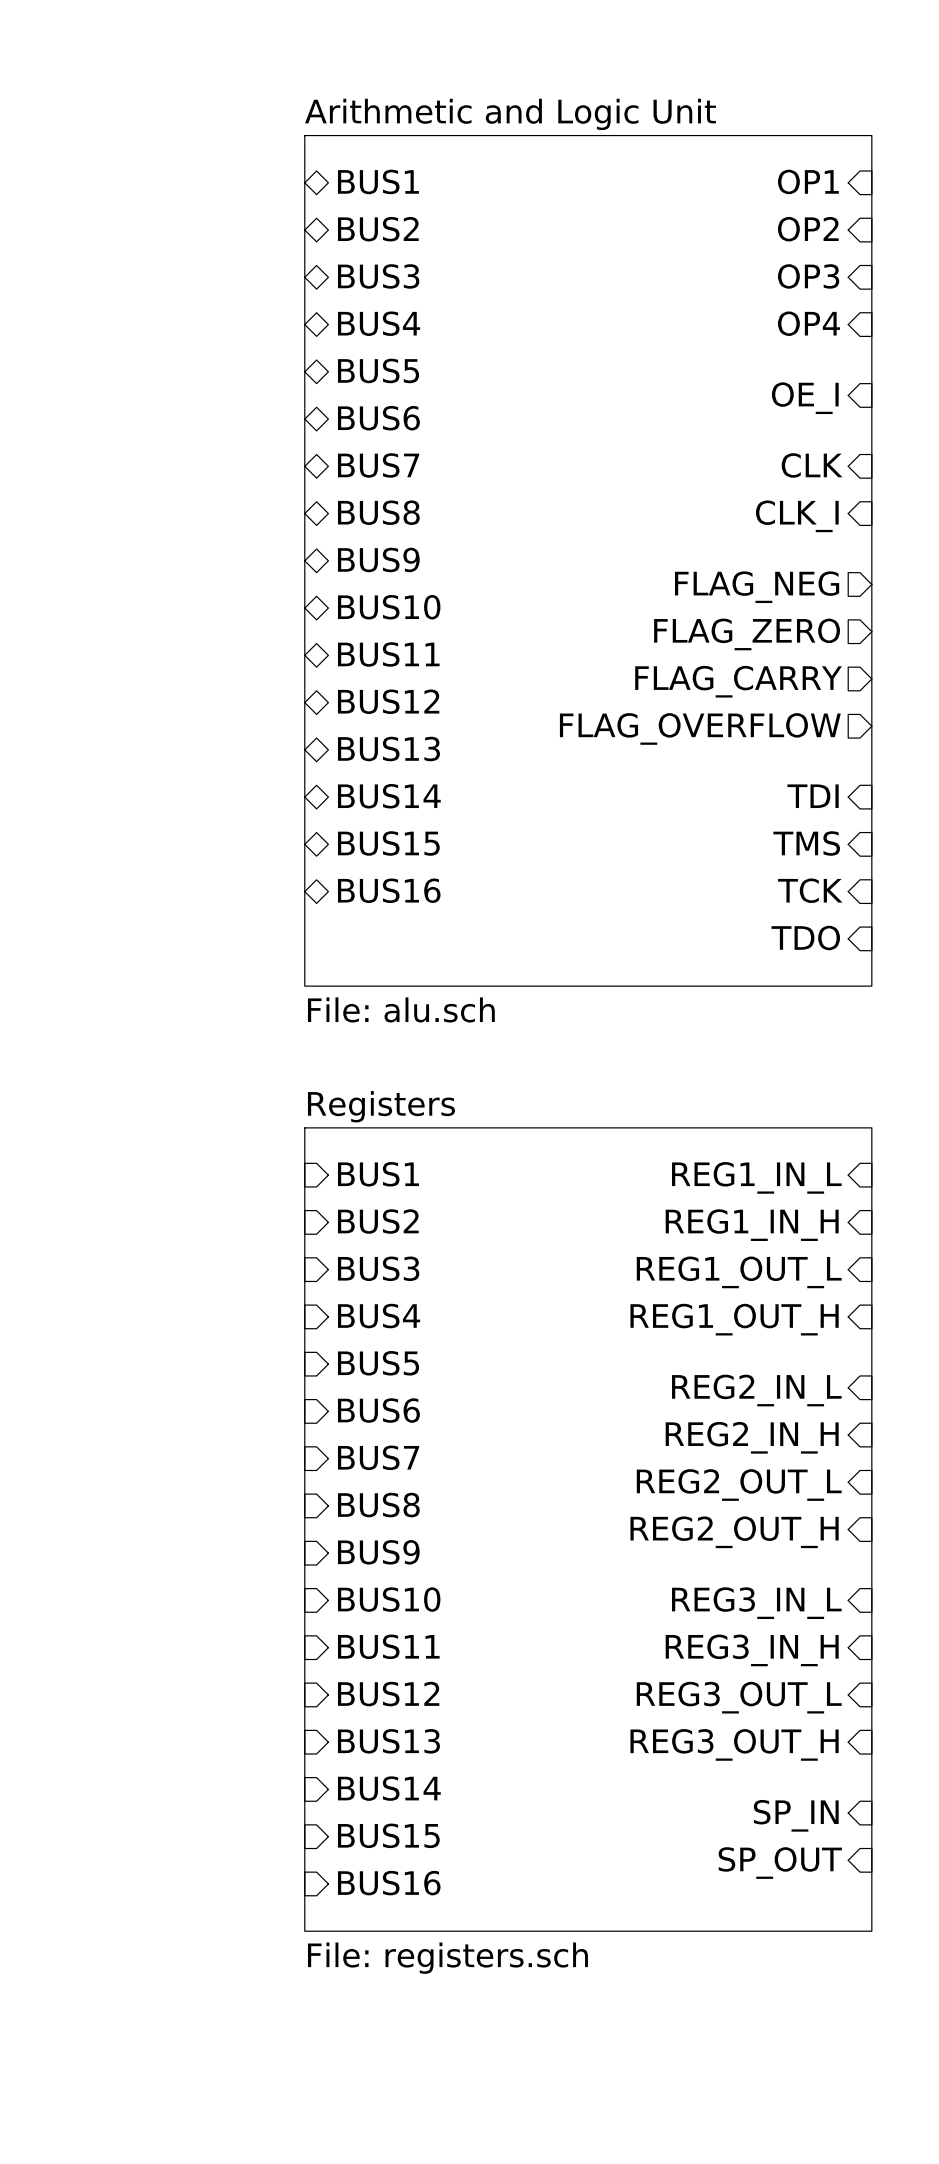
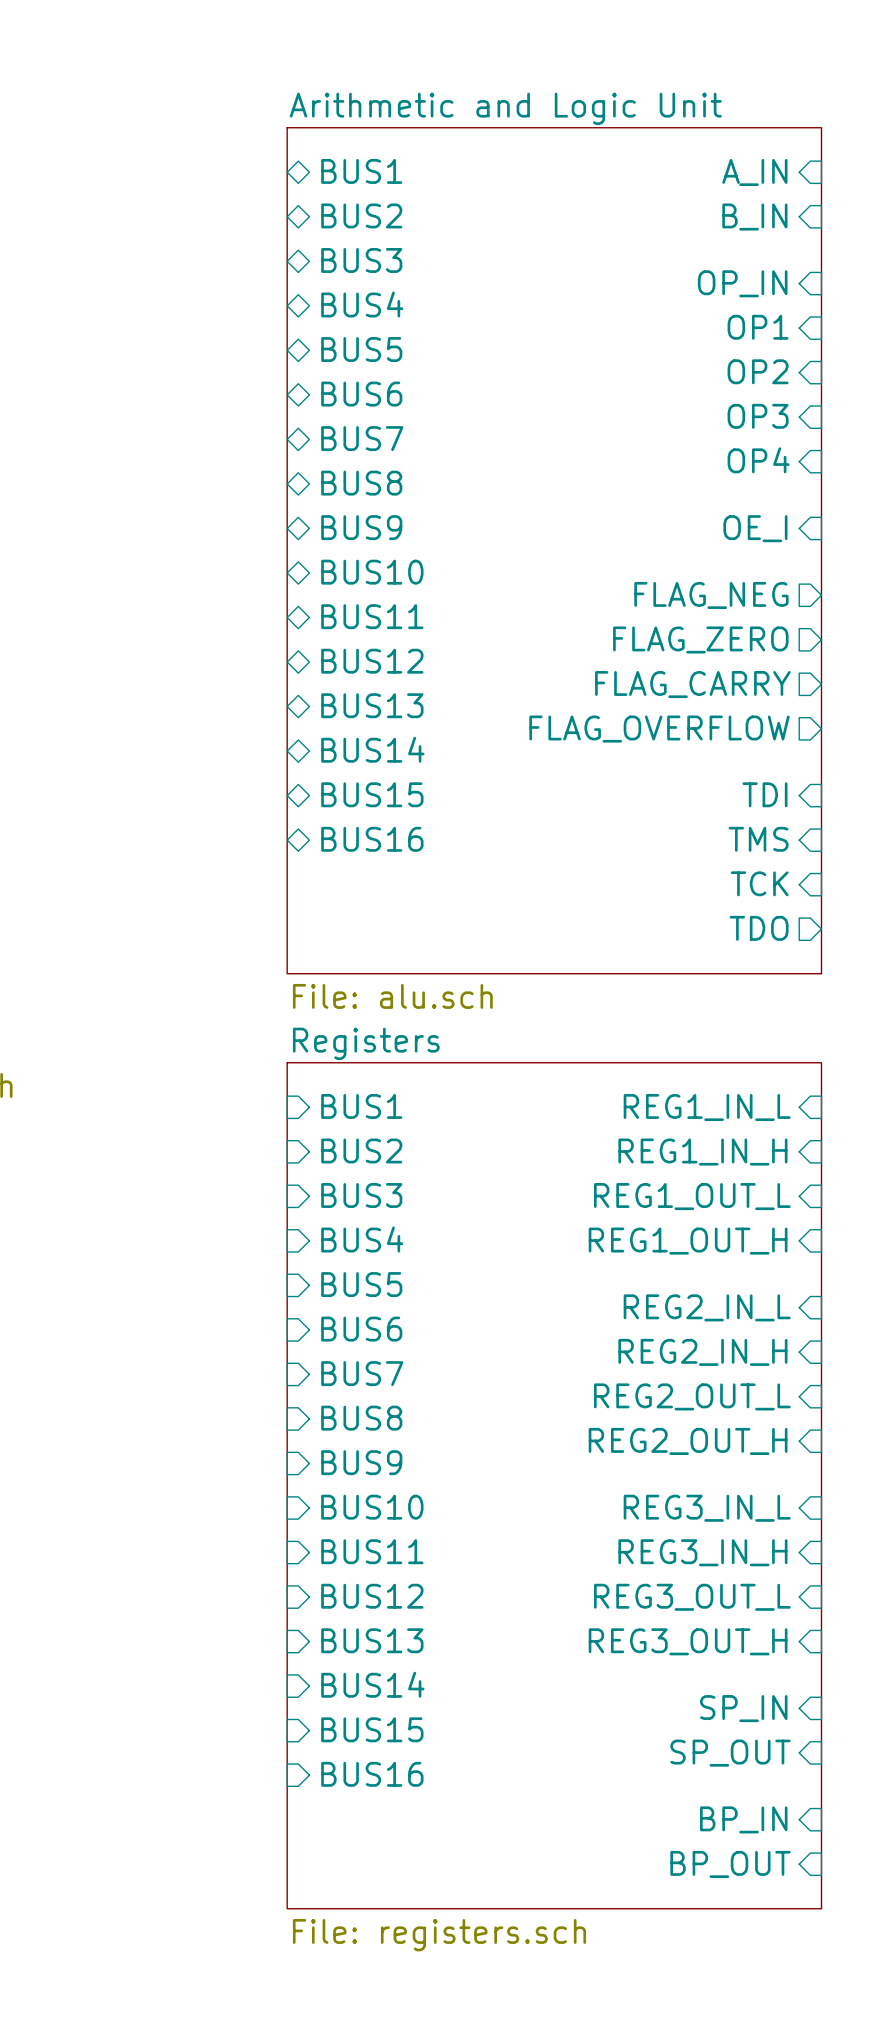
sheet pin: OP1 (808, 181) -> A_IN (754, 172)
sheet pin: OP2 (808, 229) -> B_IN (754, 217)
sheet pin position: OP3 (808, 276) -> OP3 (758, 416)
sheet pin: none -> OP_IN (742, 283)
sheet pin position: OP4 (809, 323) -> OP4 (758, 460)
sheet pin: none -> OP1 (758, 327)
sheet pin: OE_I (805, 398) -> OP2 (758, 371)
sheet pin: CLK (812, 465) -> none
sheet pin: CLK_I (797, 516) -> none
sheet Arithmetic and Logic Unit: File: alu.sch (588, 560) -> none
sheet pin: none -> OE_I (755, 528)
sheet Arithmetic and Logic Unit: none -> File: alu.sch (554, 550)
sheet pin: FLAG_NEG (757, 587) -> none
sheet pin: FLAG_ZERO (747, 634) -> FLAG_NEG (711, 595)
sheet pin: FLAG_CARRY (738, 681) -> FLAG_ZERO (700, 640)
sheet pin: FLAG_OVERFLOW (700, 728) -> FLAG_CARRY (692, 684)
sheet pin: none -> FLAG_OVERFLOW (659, 729)
sheet pin: TDI (813, 796) -> none
sheet pin: TMS (806, 843) -> TDI (764, 794)
sheet pin: TCK (810, 890) -> TMS (758, 839)
sheet pin: TDO (805, 938) -> TCK (759, 883)
sheet pin: none -> TDO (759, 928)
sheet Registers: File: registers.sch (588, 1529) -> none
sheet Registers: none -> File: registers.sch (554, 1485)
sheet pin: none -> BP_IN (743, 1819)
sheet pin: none -> BP_OUT (730, 1864)

